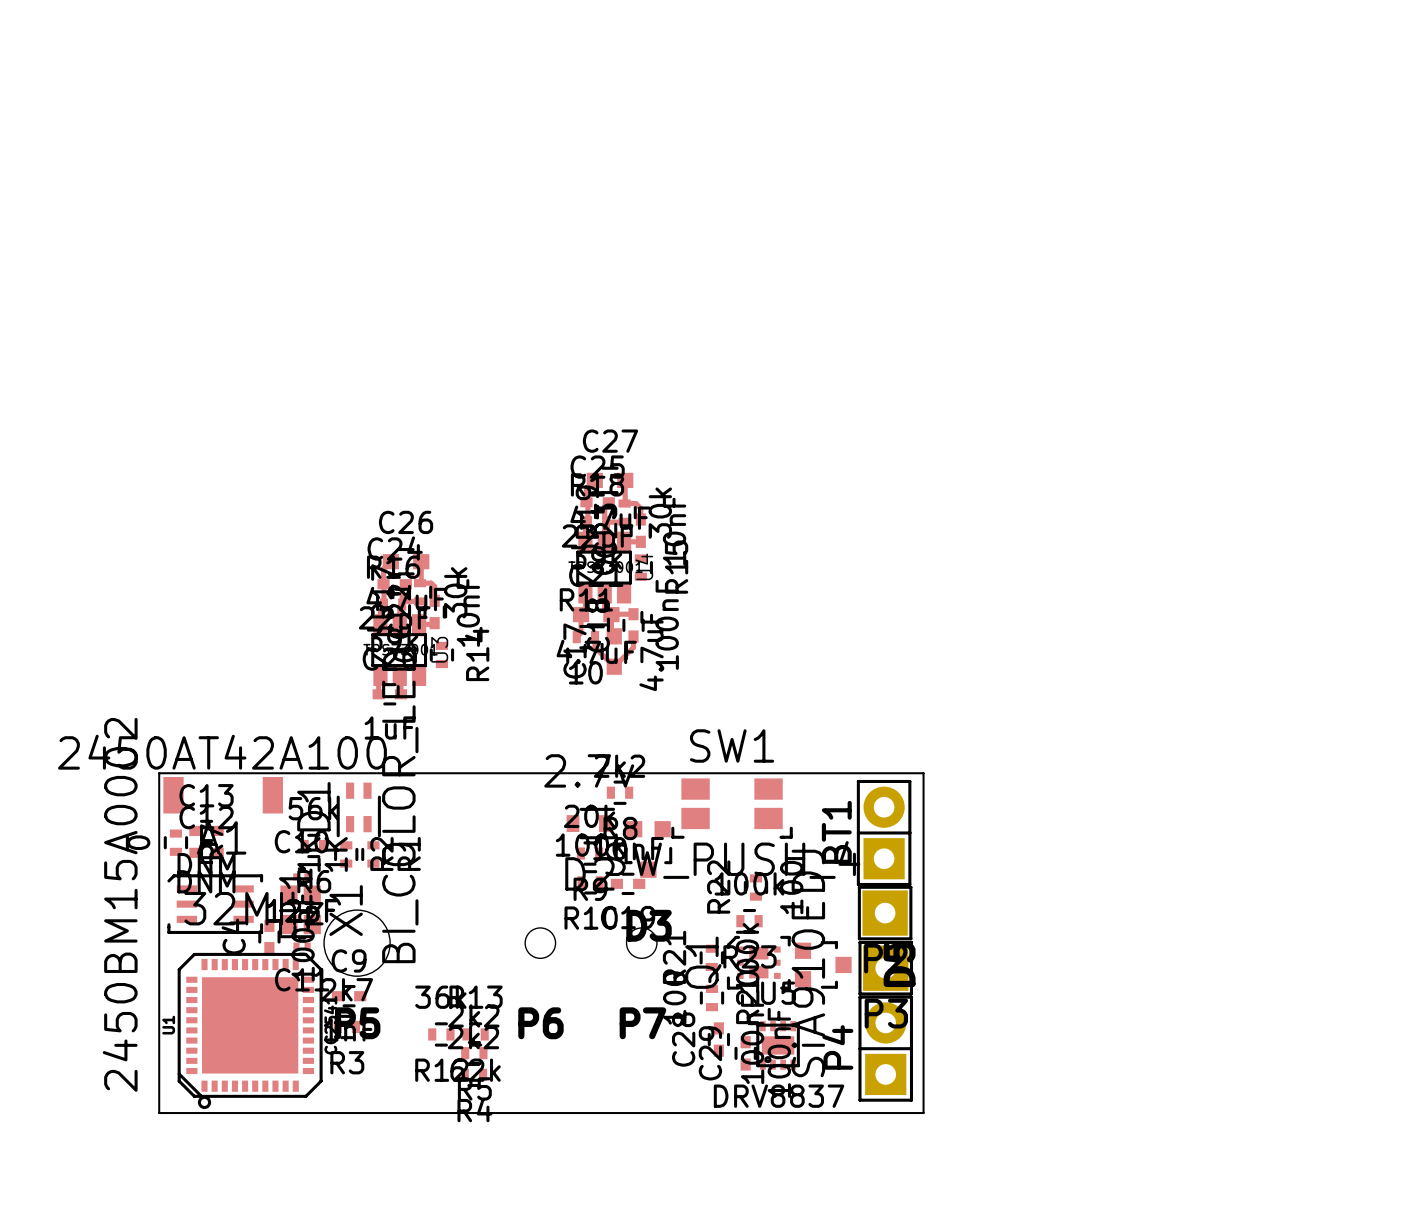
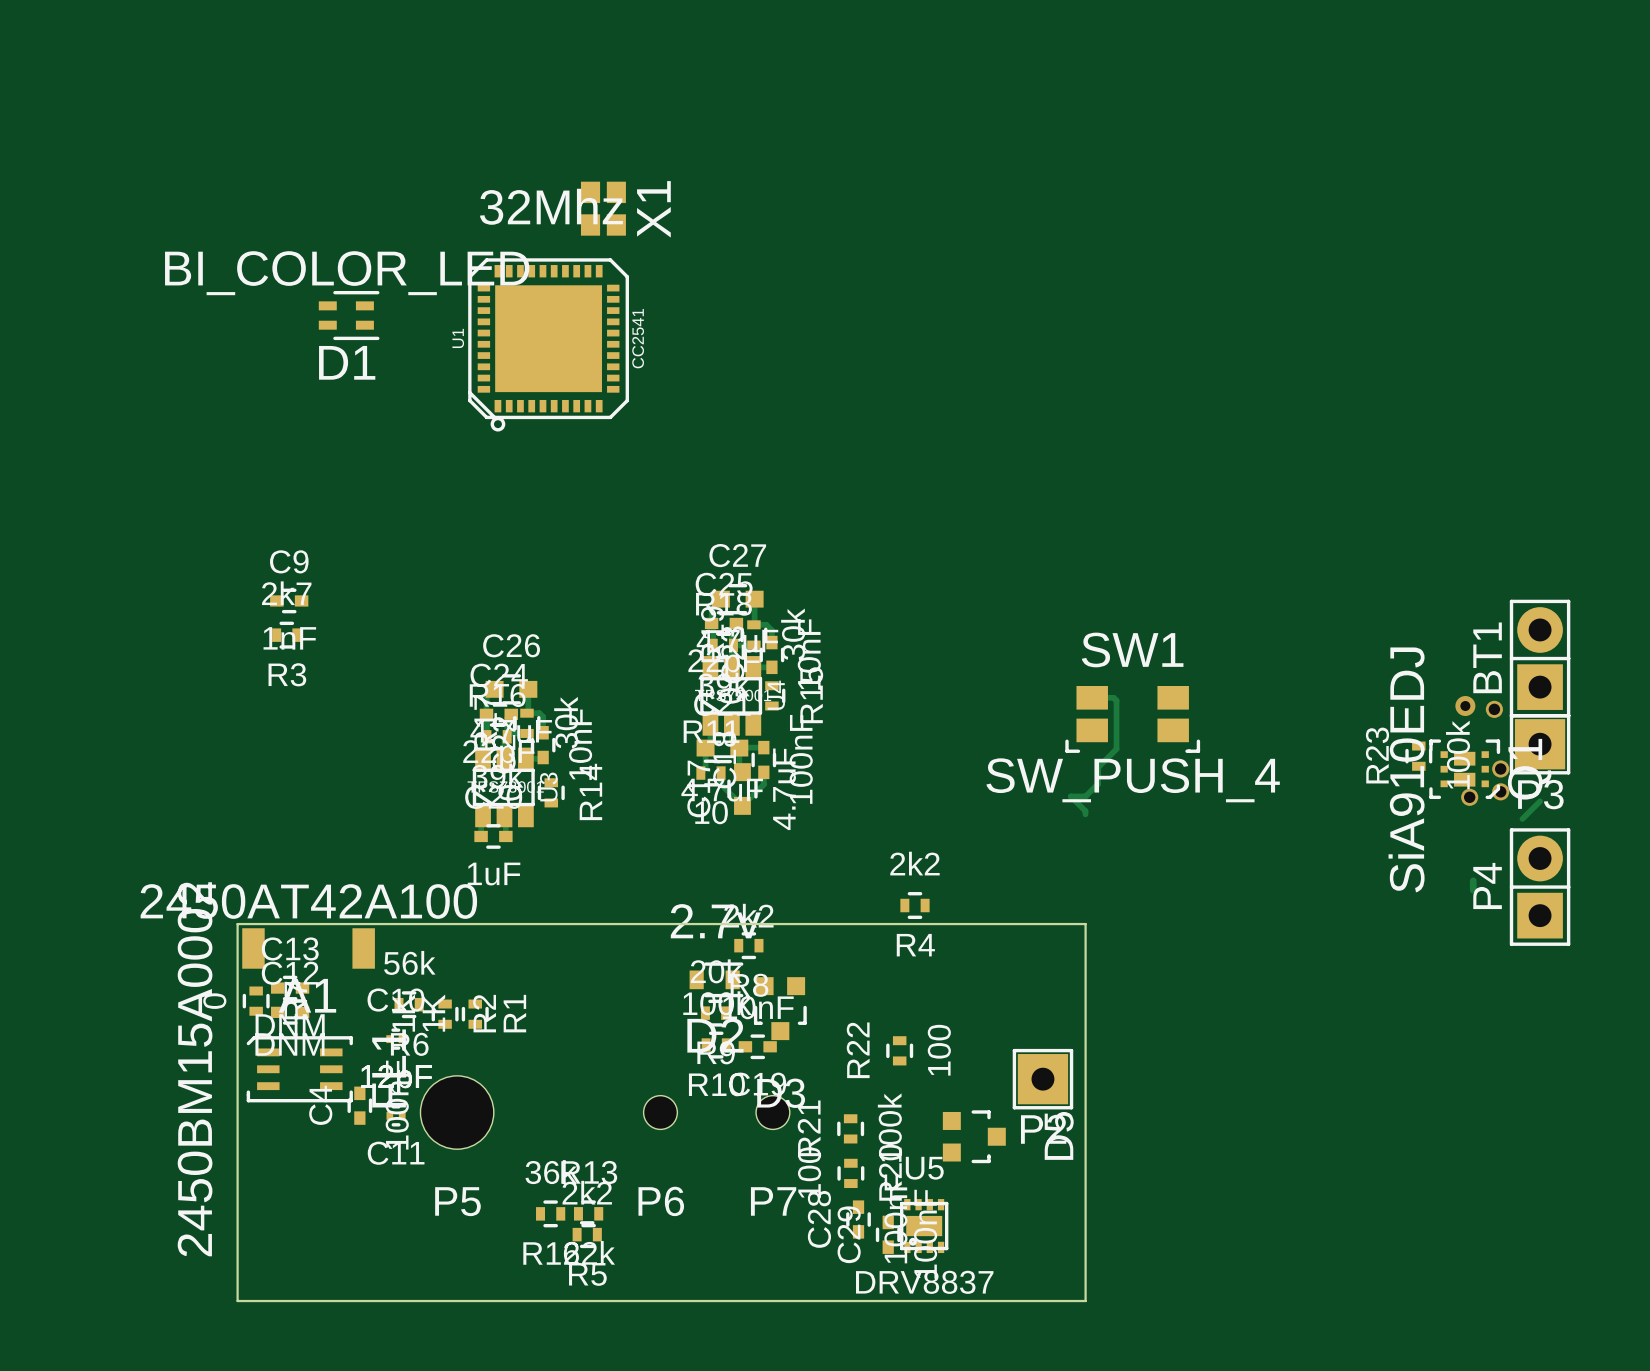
track: none -> (1092, 697) (1113, 697) (1116, 700) (1116, 749) (1098, 767) (1098, 783) (1085, 796) (1070, 796) (1085, 811) (1085, 814)
via: none -> (1465, 706)
via: none -> (1494, 709)
via: none -> (1500, 768)
via: none -> (1500, 791)
via: none -> (1469, 797)
track: none -> (1540, 801) (1522, 818)
track: none -> (1473, 880) (1473, 890)
SW1 position: (732, 808) -> (1132, 719)
D1 rotation: 0° (358, 809) -> 90° counterclockwise (349, 315)
D1 position: (358, 809) -> (349, 315)
BT1 position: (884, 832) -> (1540, 658)
X1 position: (300, 909) -> (603, 208)
R23 rotation: 0° (749, 921) -> 90° clockwise (1418, 756)
R23 position: (749, 921) -> (1418, 756)
Q1 rotation: 0° (758, 962) -> 180° (1464, 769)
Q1 position: (758, 962) -> (1464, 769)
P3 position: (885, 968) -> (1540, 744)
C9 position: (349, 996) -> (289, 600)
R3 position: (346, 1027) -> (286, 635)
U1 position: (250, 1030) -> (548, 344)
P4 position: (885, 1048) -> (1540, 887)
R4 position: (473, 1074) -> (914, 905)

